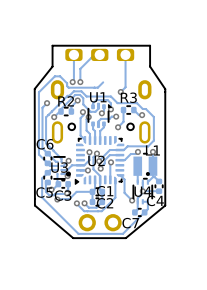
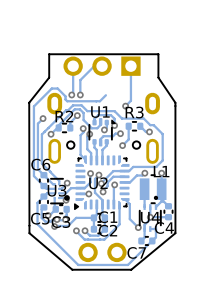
part footprint: [65, 48, 135, 62] -> [63, 56, 141, 76]
via: none -> (56, 219)

